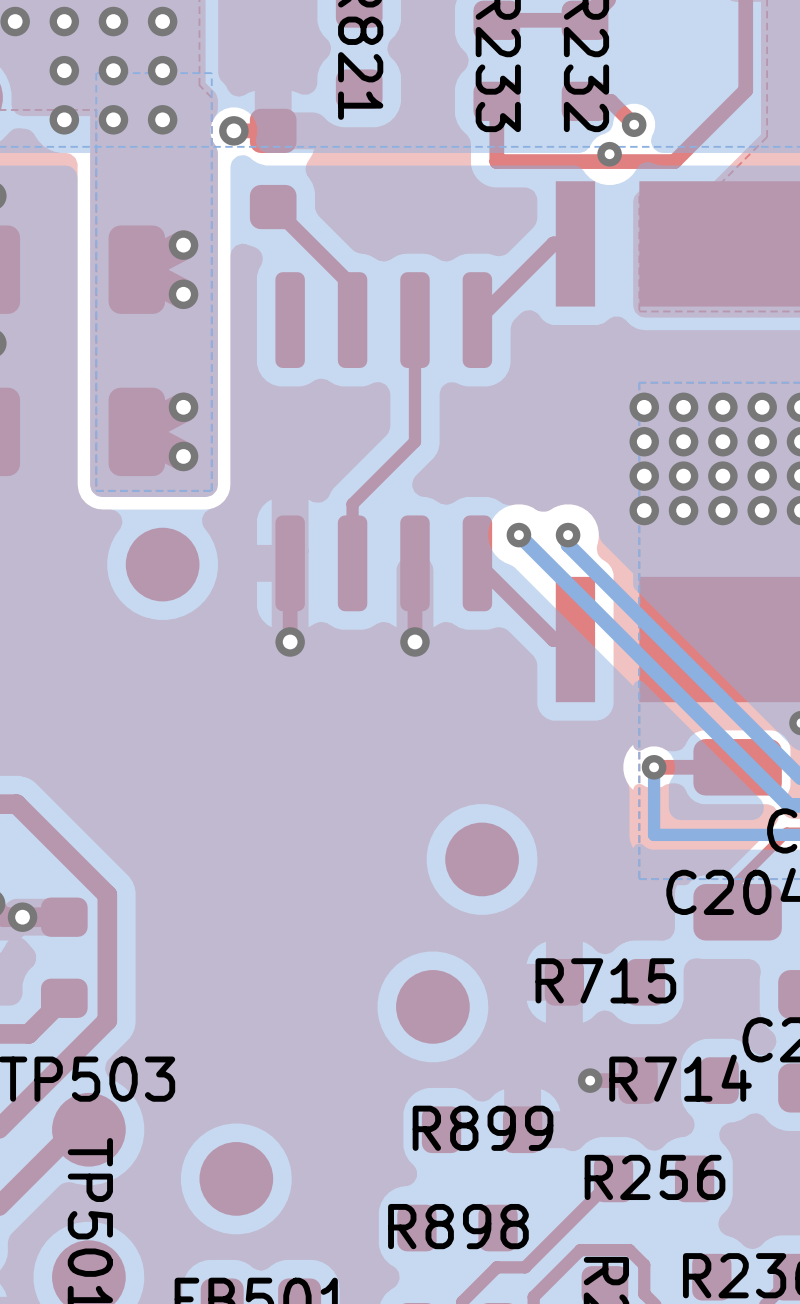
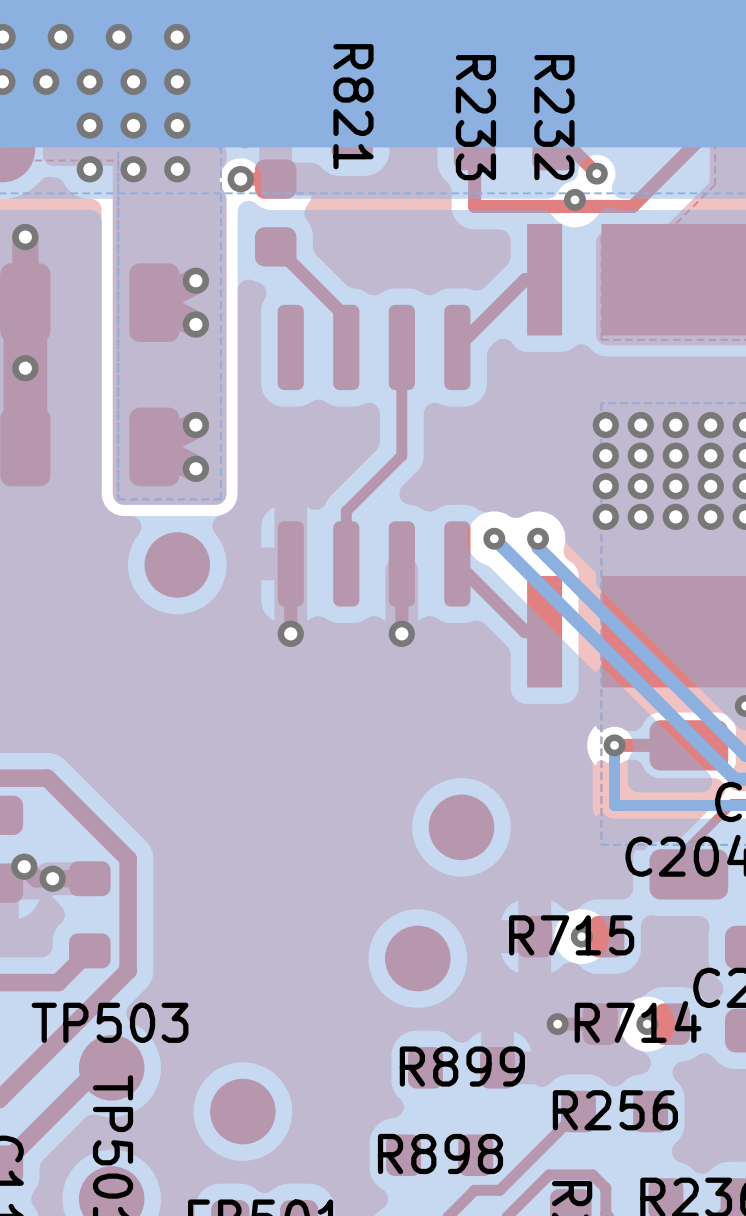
via: none -> (581, 936)
via: none -> (647, 1024)

